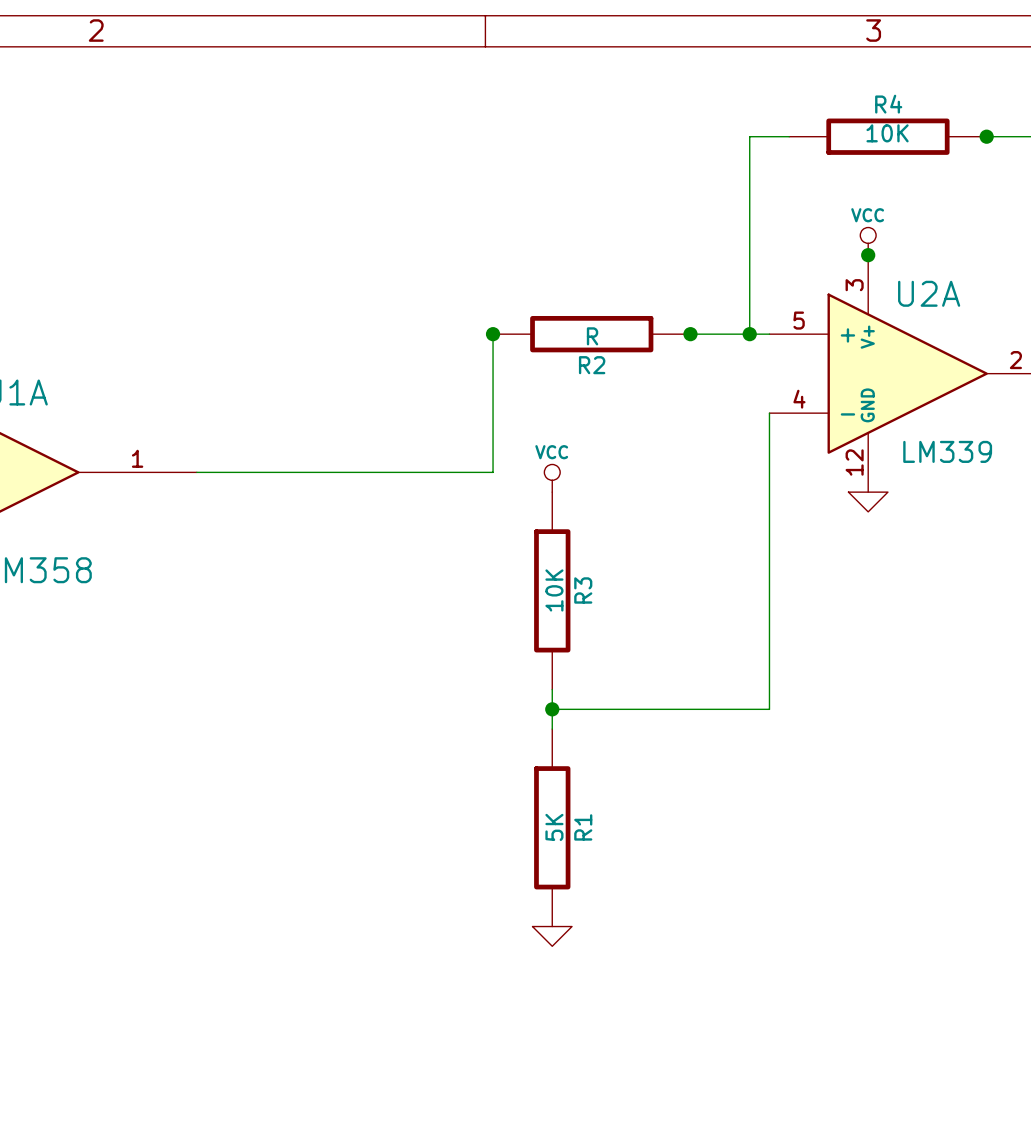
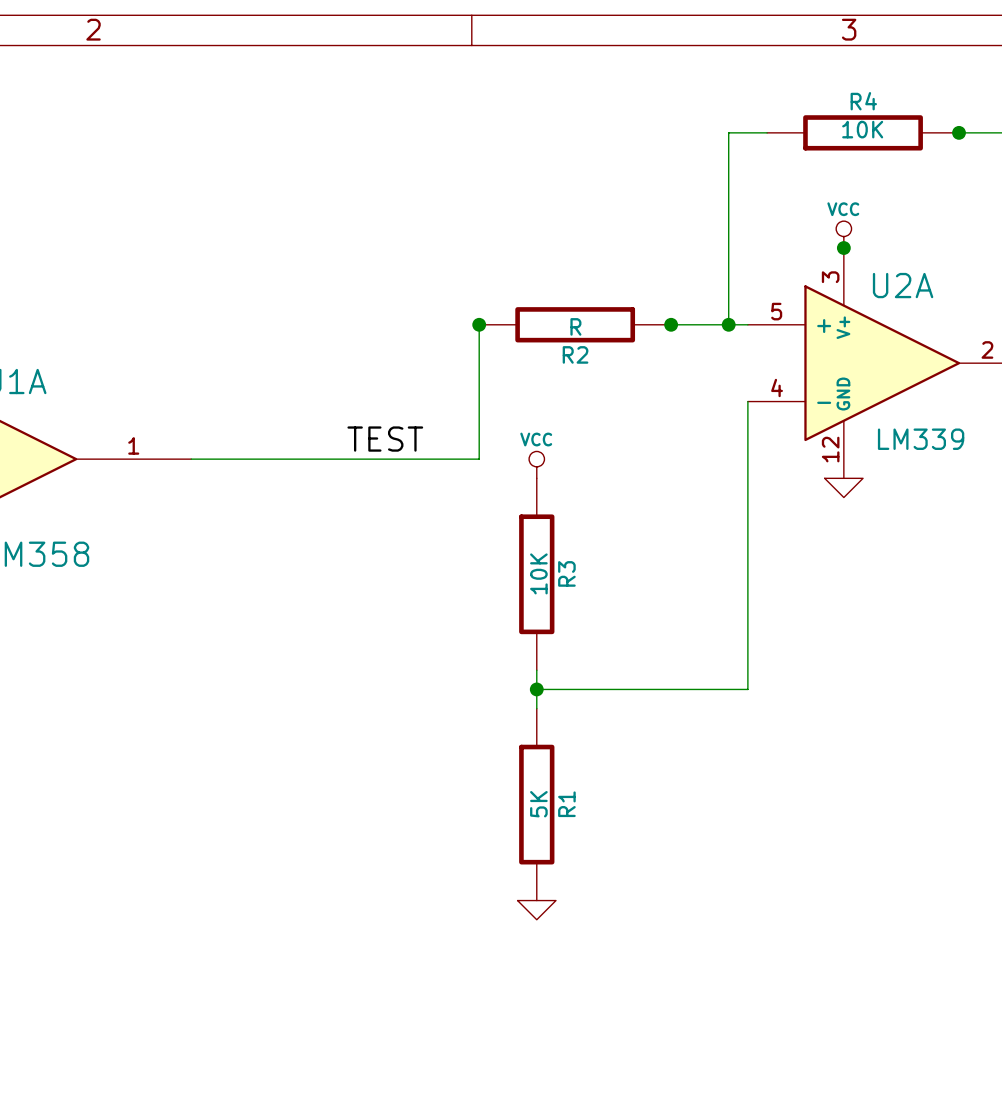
label: none -> TEST (385, 439)

